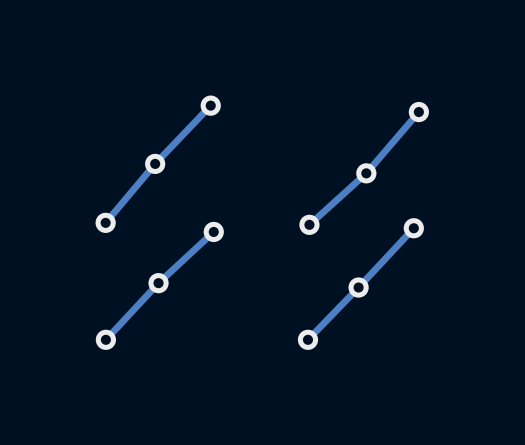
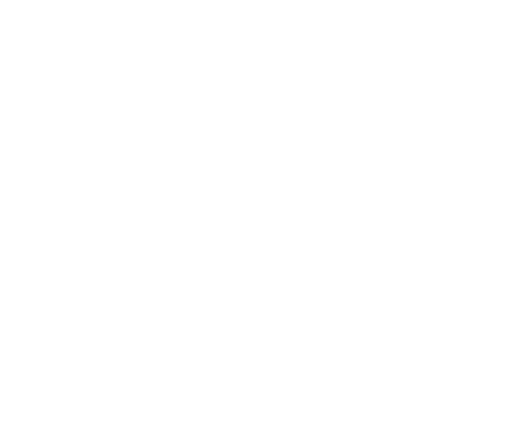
track: (210, 105) (155, 163) (105, 222) -> none
via: (210, 105) -> none
track: (418, 112) (366, 173) (309, 224) -> none
via: (418, 112) -> none
via: (155, 163) -> none
via: (366, 173) -> none
via: (105, 222) -> none
via: (309, 224) -> none
track: (413, 228) (307, 339) -> none
via: (413, 228) -> none
track: (213, 231) (158, 283) (105, 339) -> none
via: (213, 231) -> none
via: (158, 283) -> none
via: (358, 287) -> none
via: (105, 339) -> none
via: (307, 339) -> none

